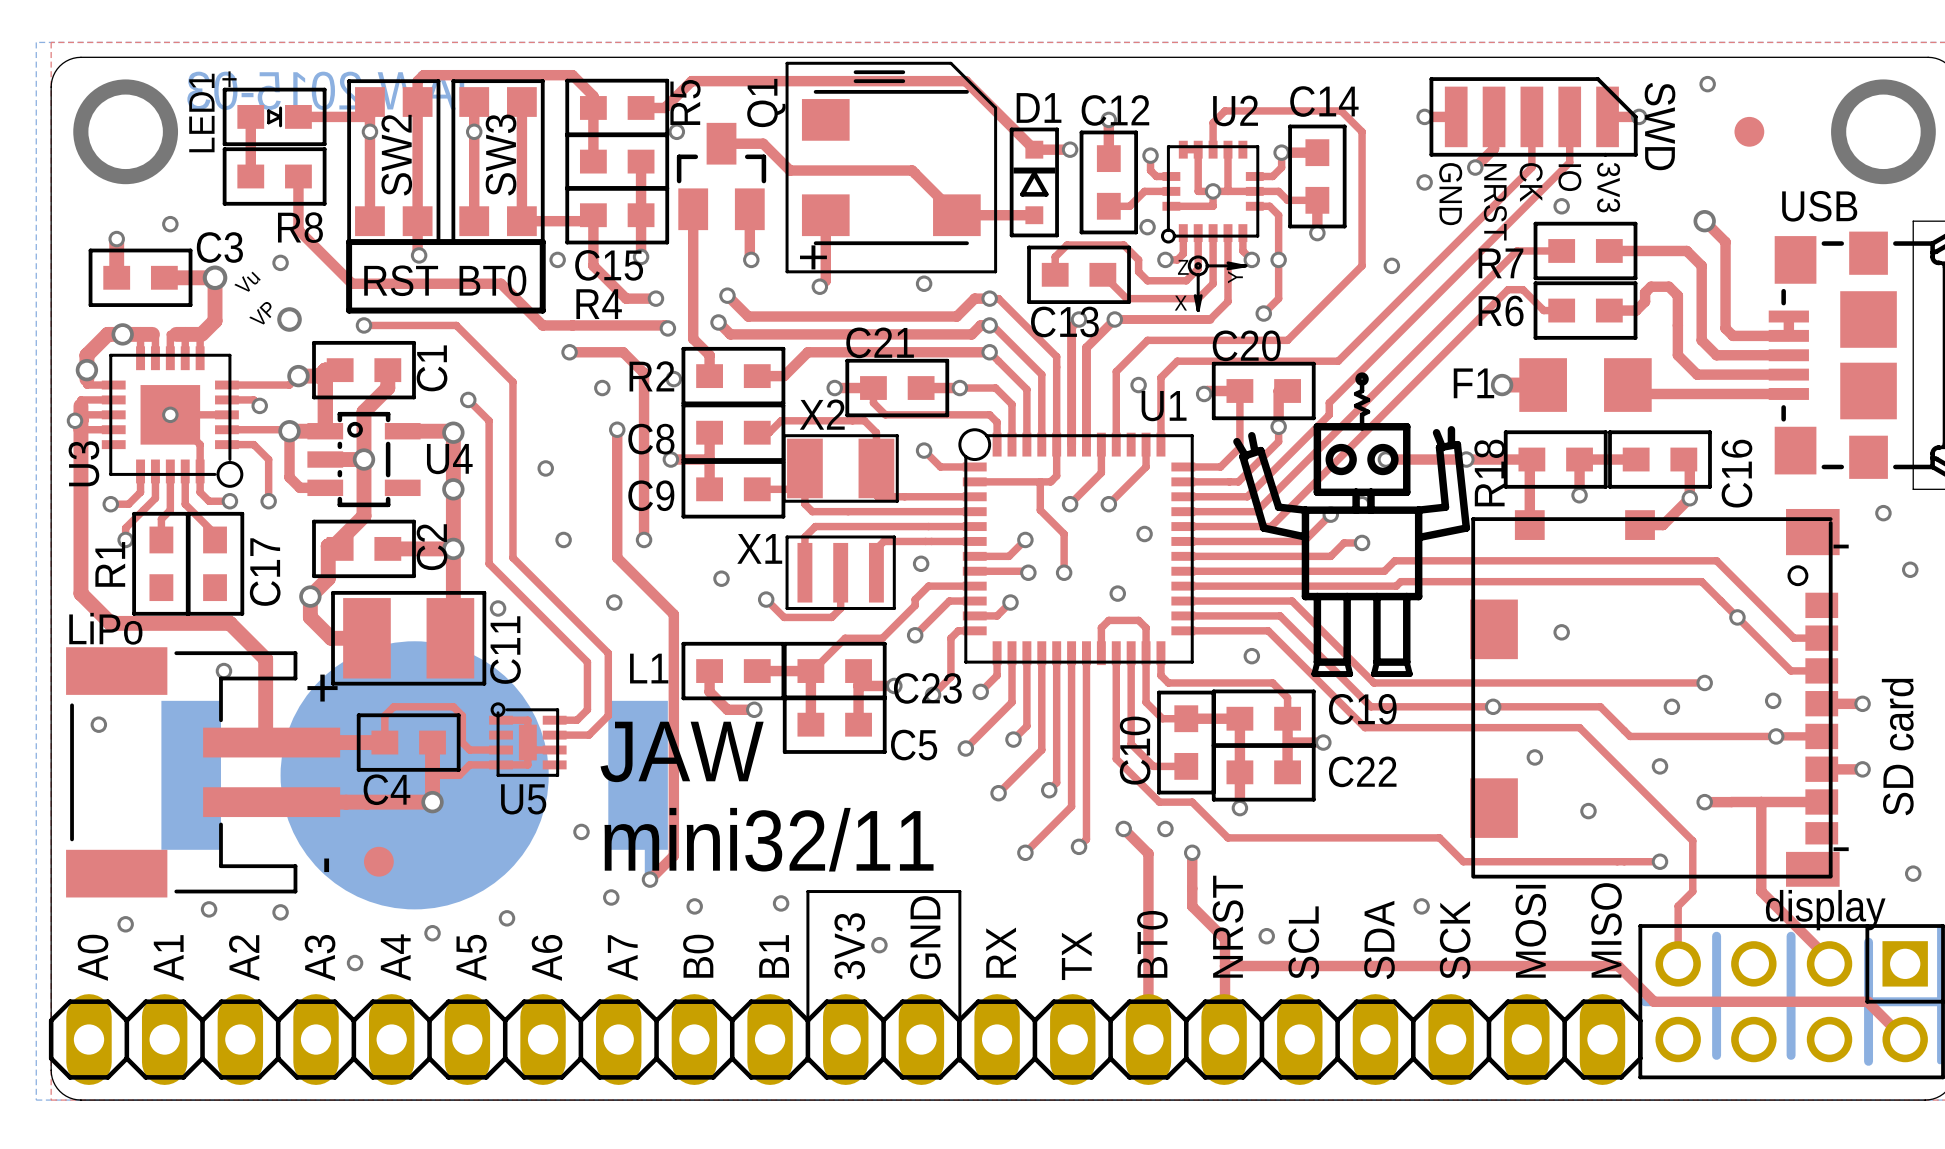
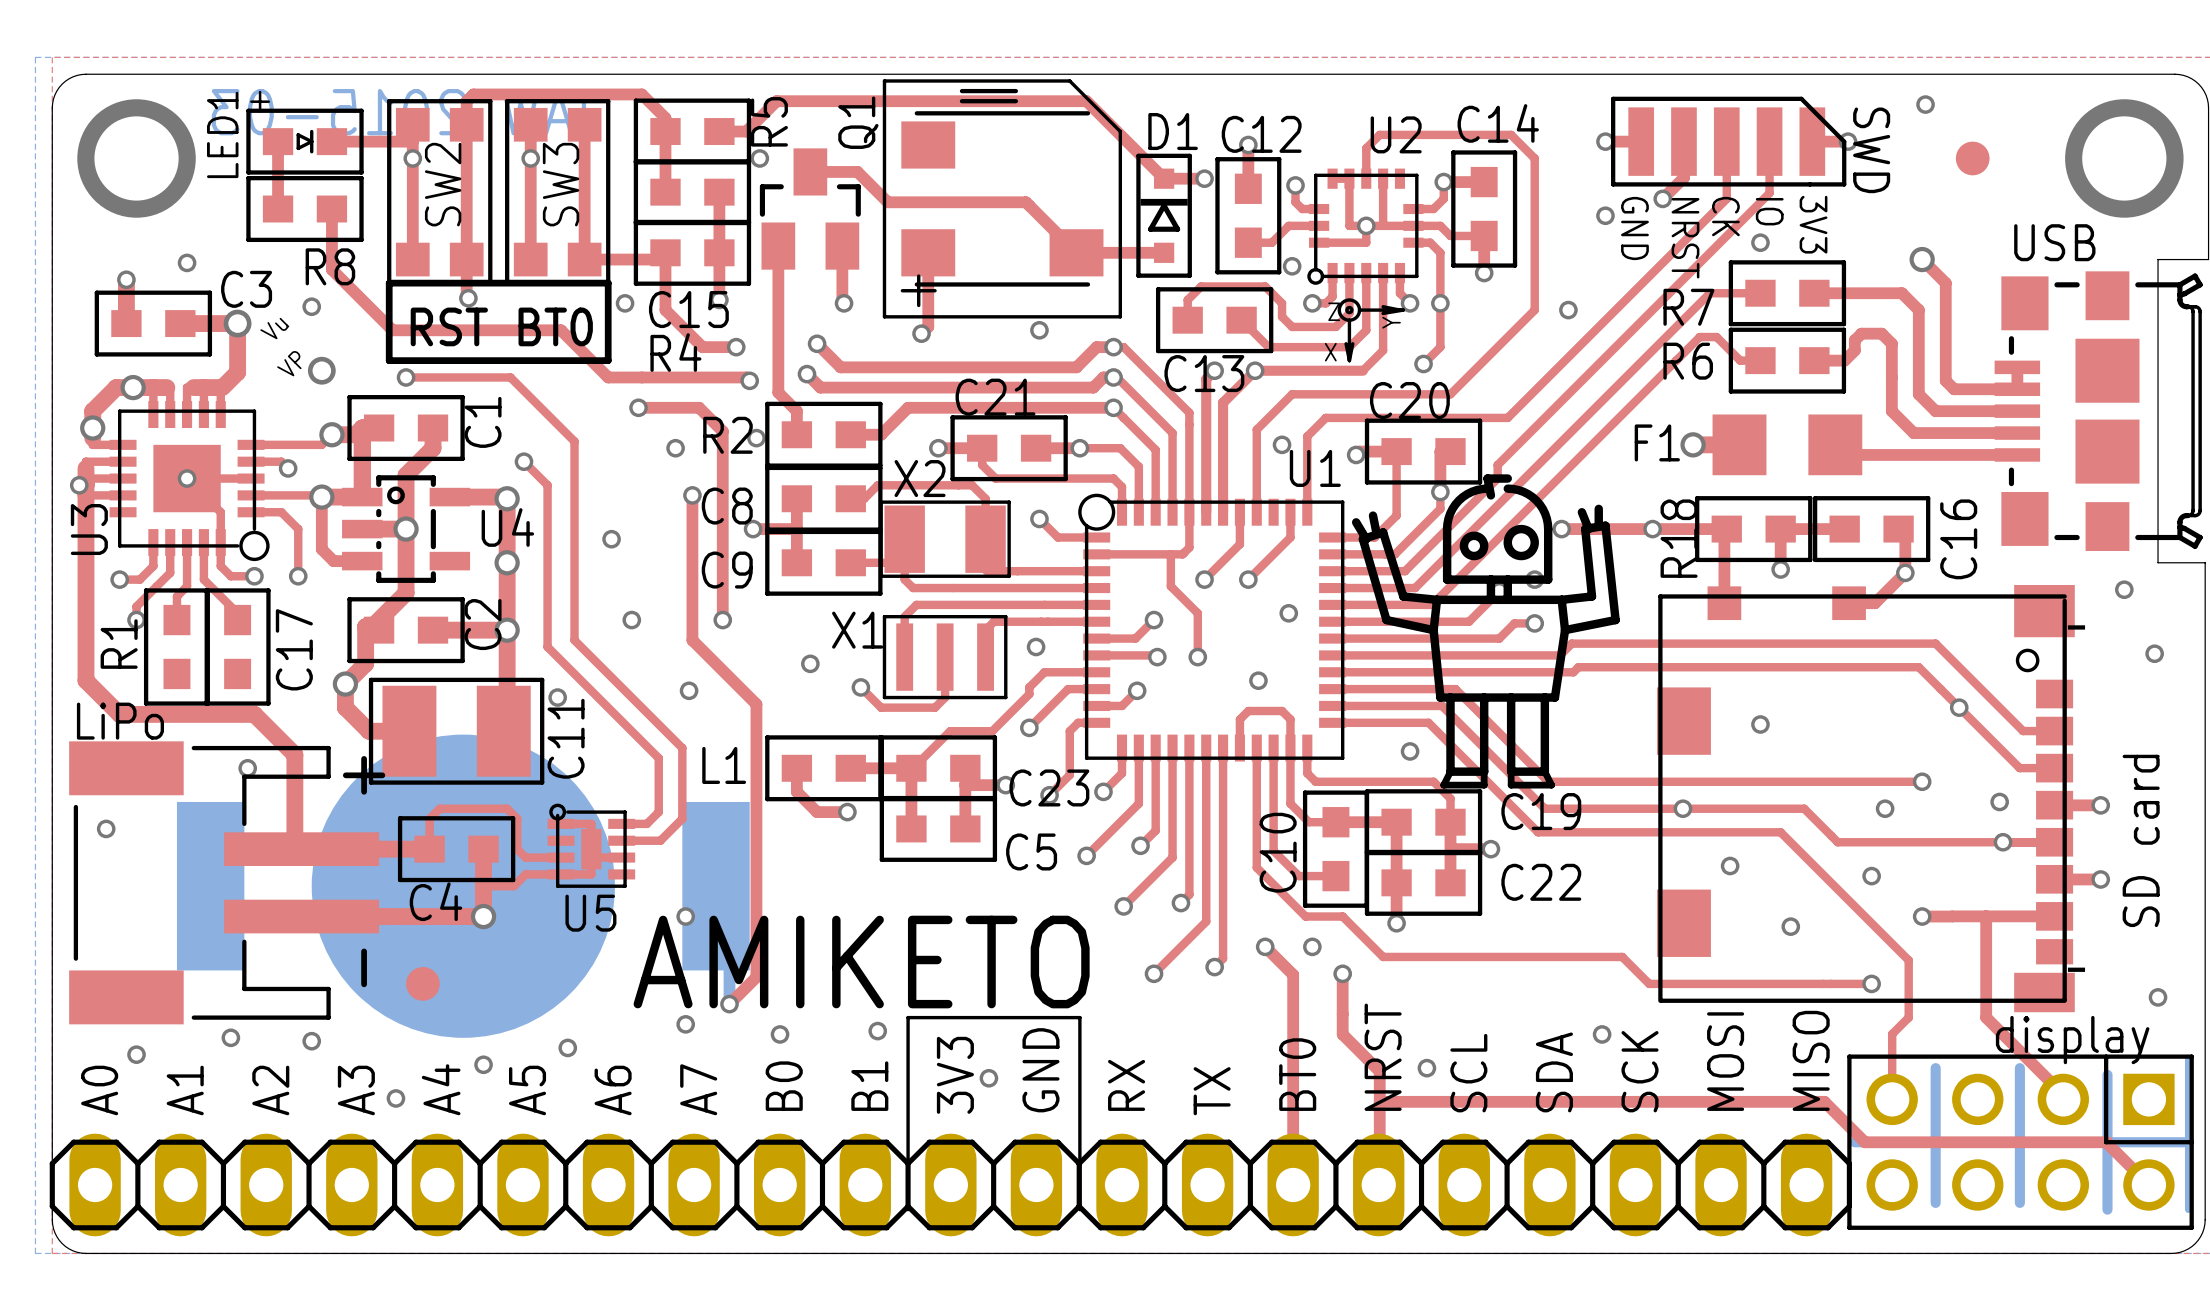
drawing: [1233, 372, 1471, 678] -> none
drawing: none -> [1351, 474, 1620, 789]
text: JAW (682, 751) -> none
via position: (581, 831) -> (685, 916)
text: mini32/11 (769, 839) -> none
text: none -> AMIKETO (861, 962)

